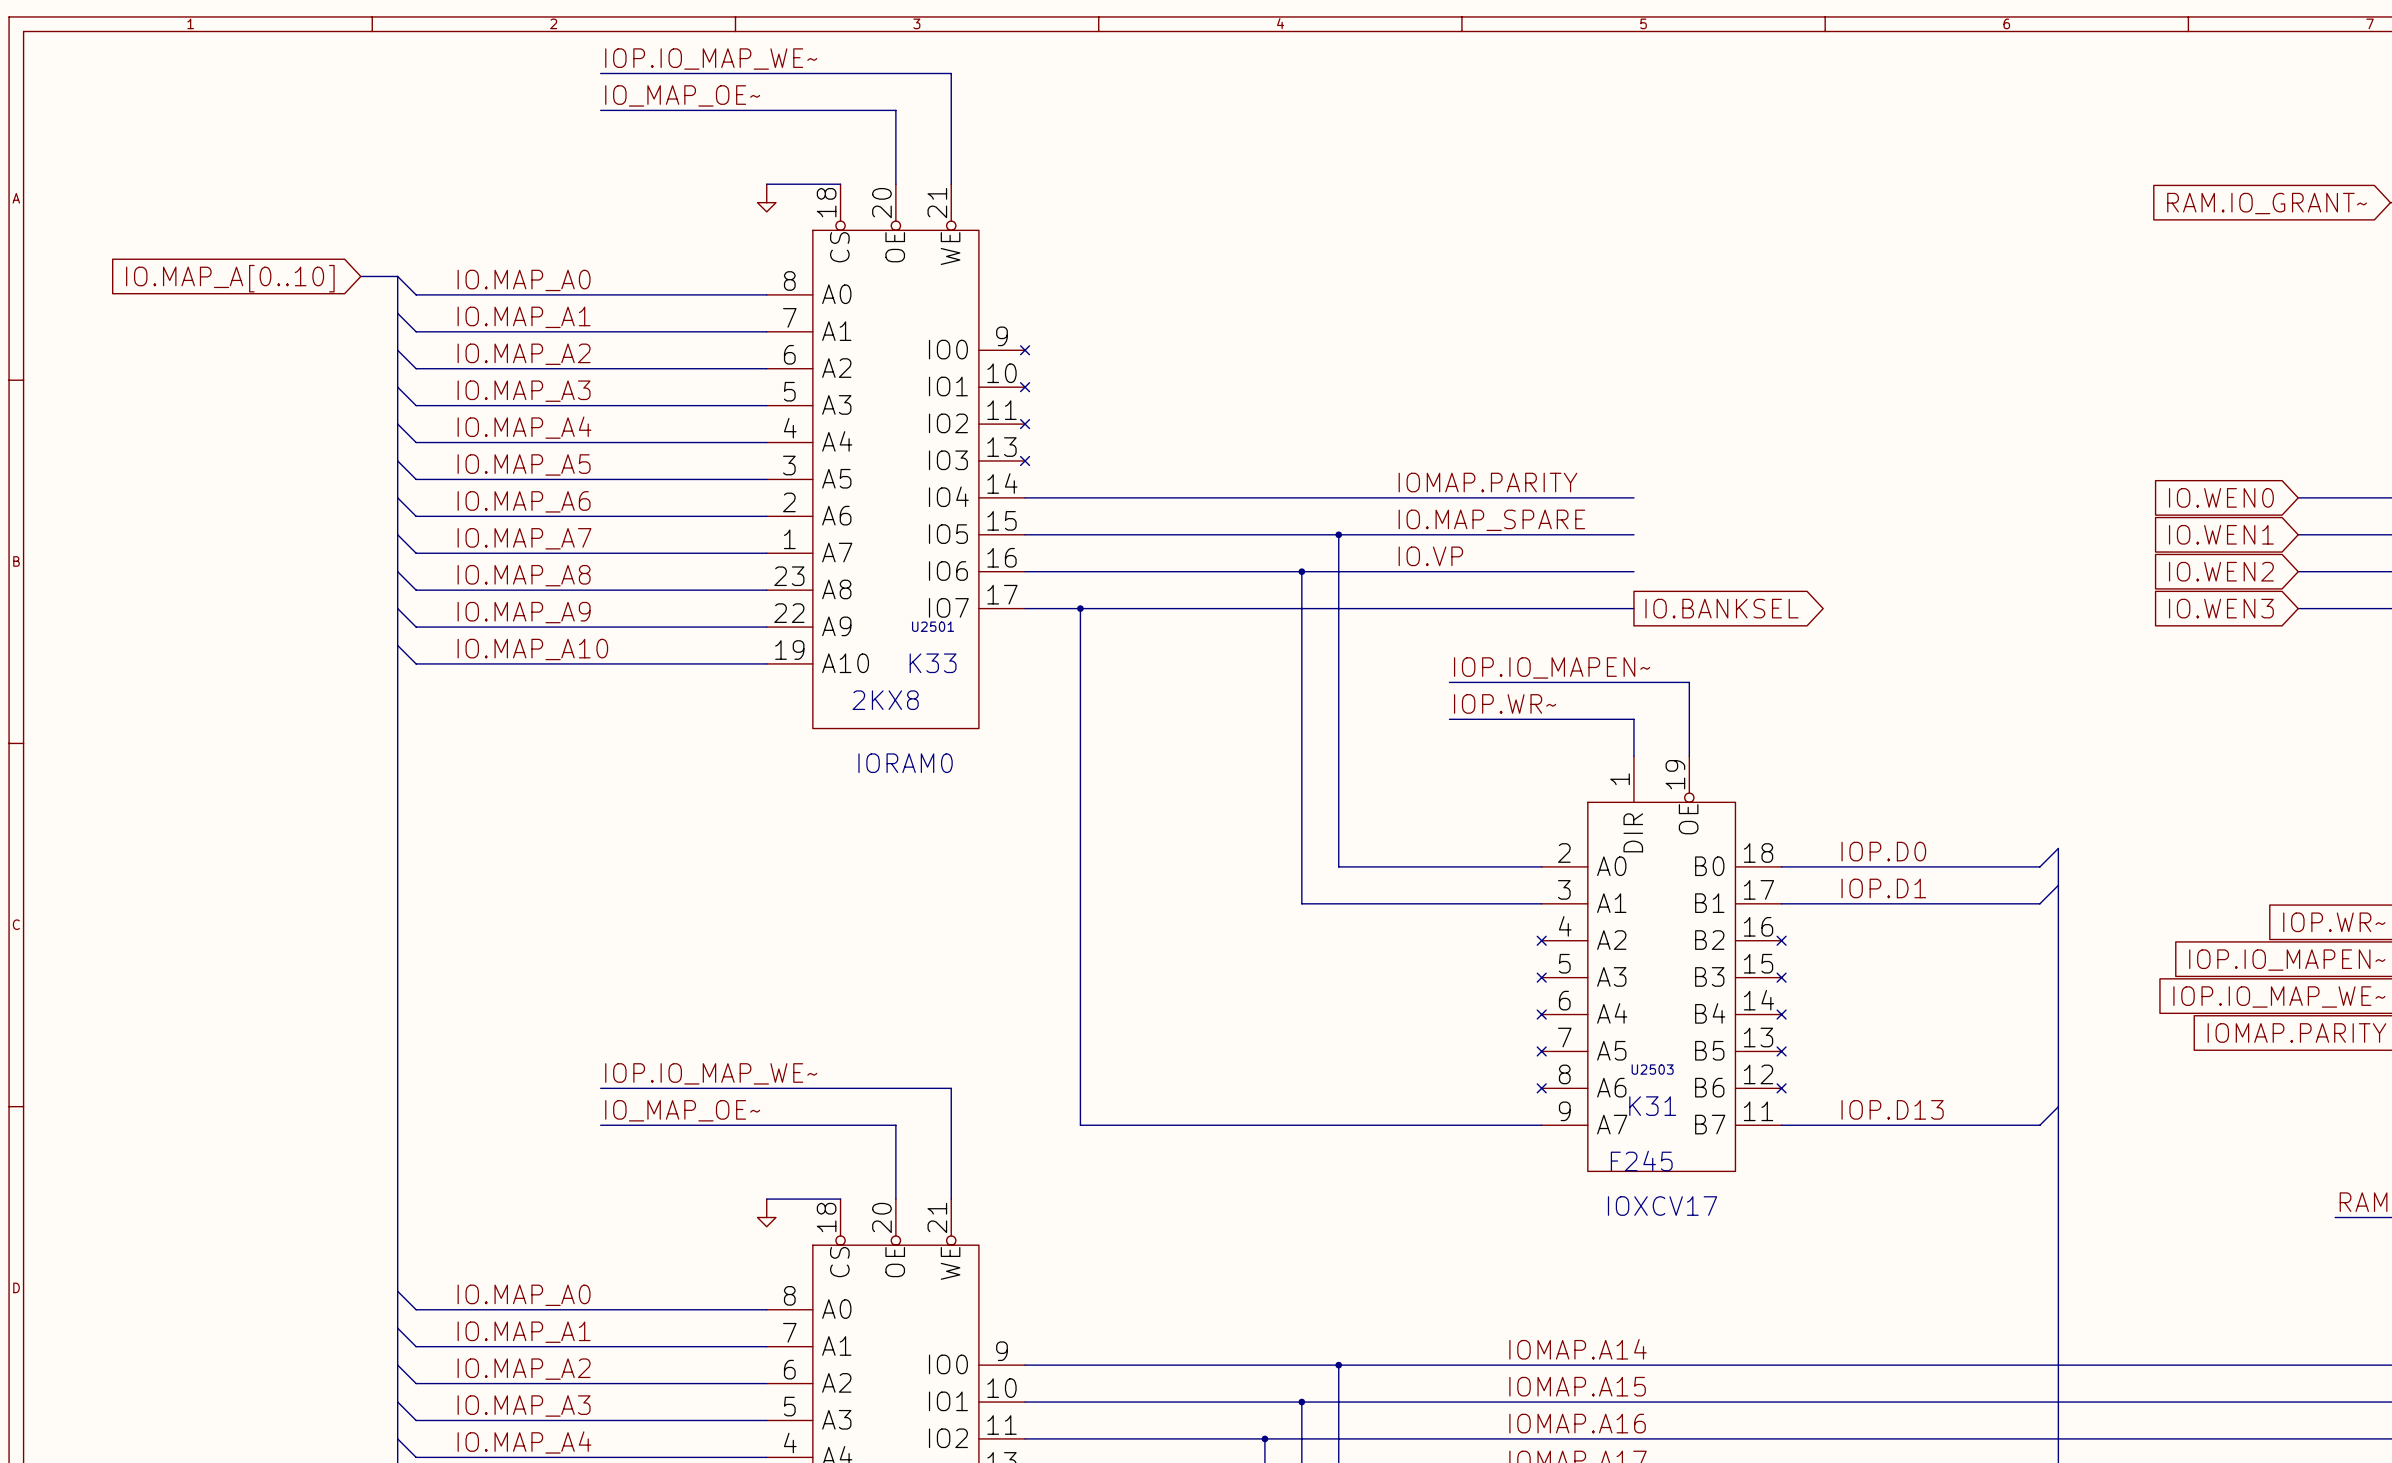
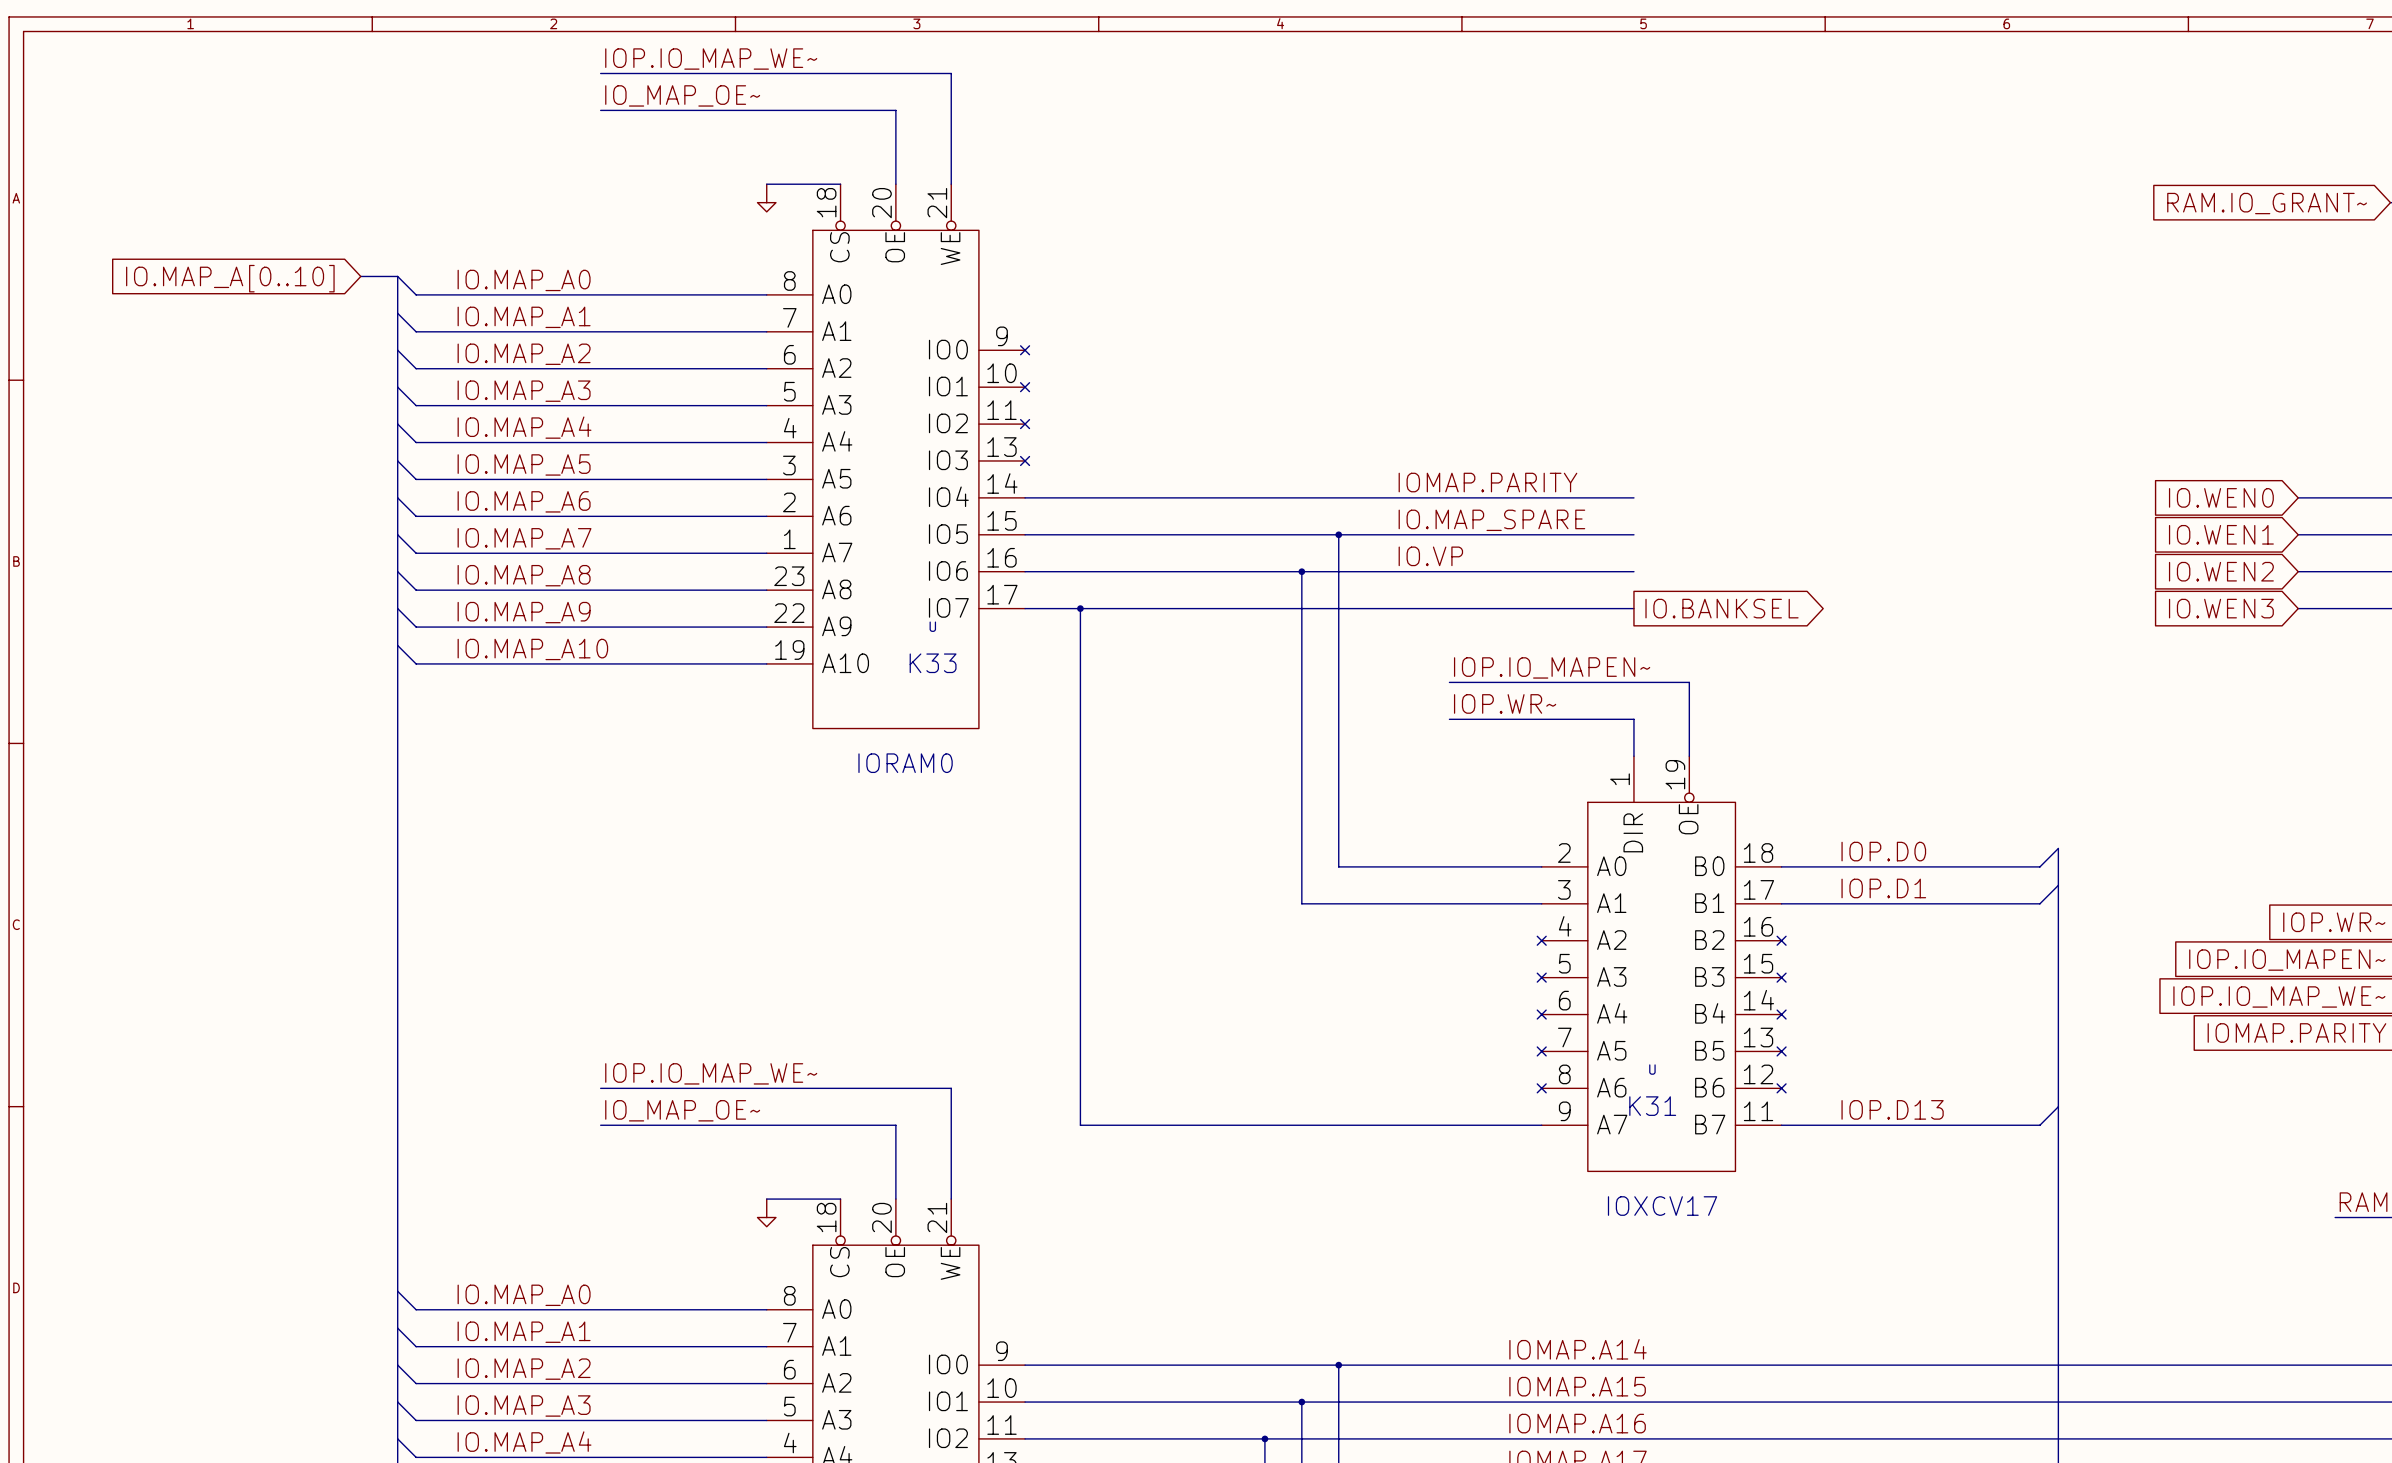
U2501 name: U2501 (933, 626) -> U (932, 626)
U2501 value: 2KX8 (885, 700) -> none
U2503 name: U2503 (1652, 1069) -> U (1652, 1069)
U2503 value: F245 (1641, 1161) -> none

